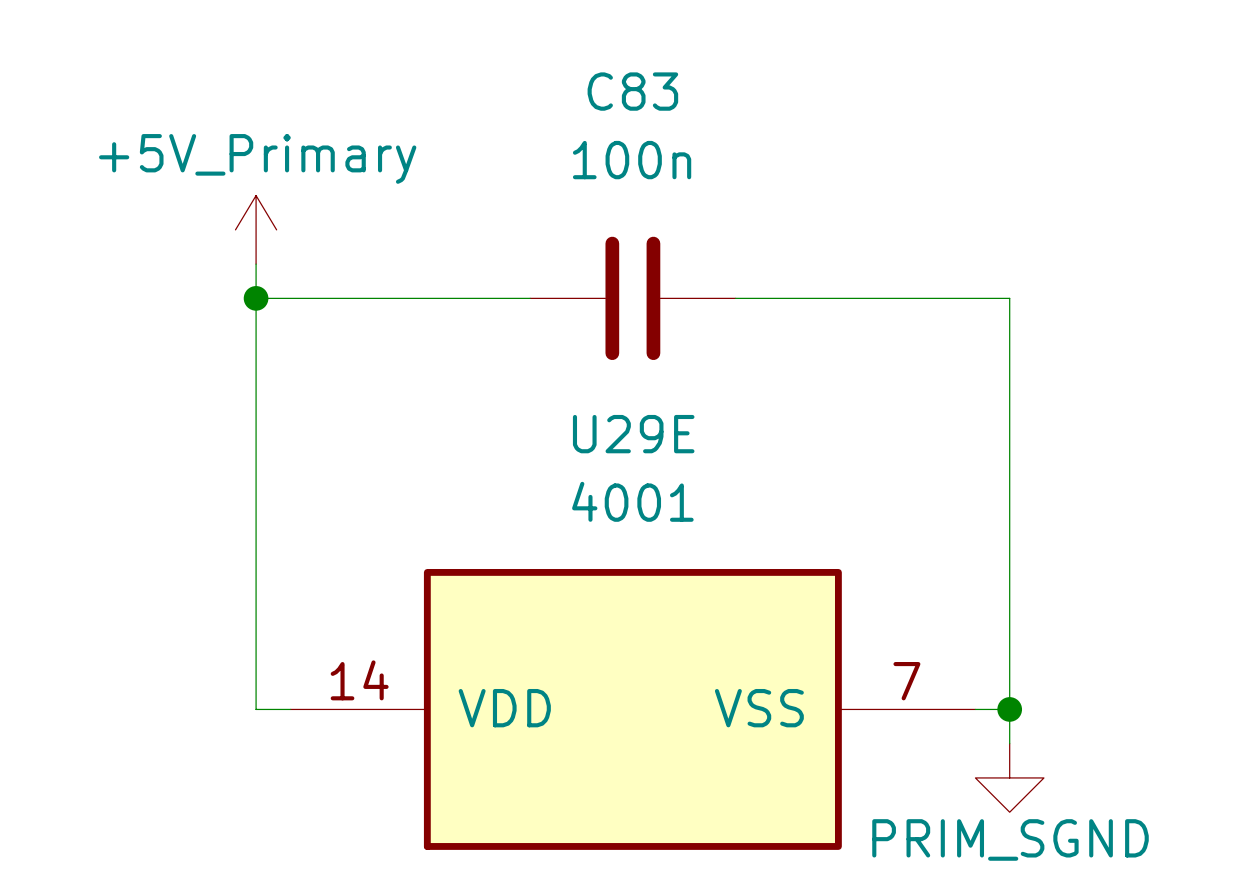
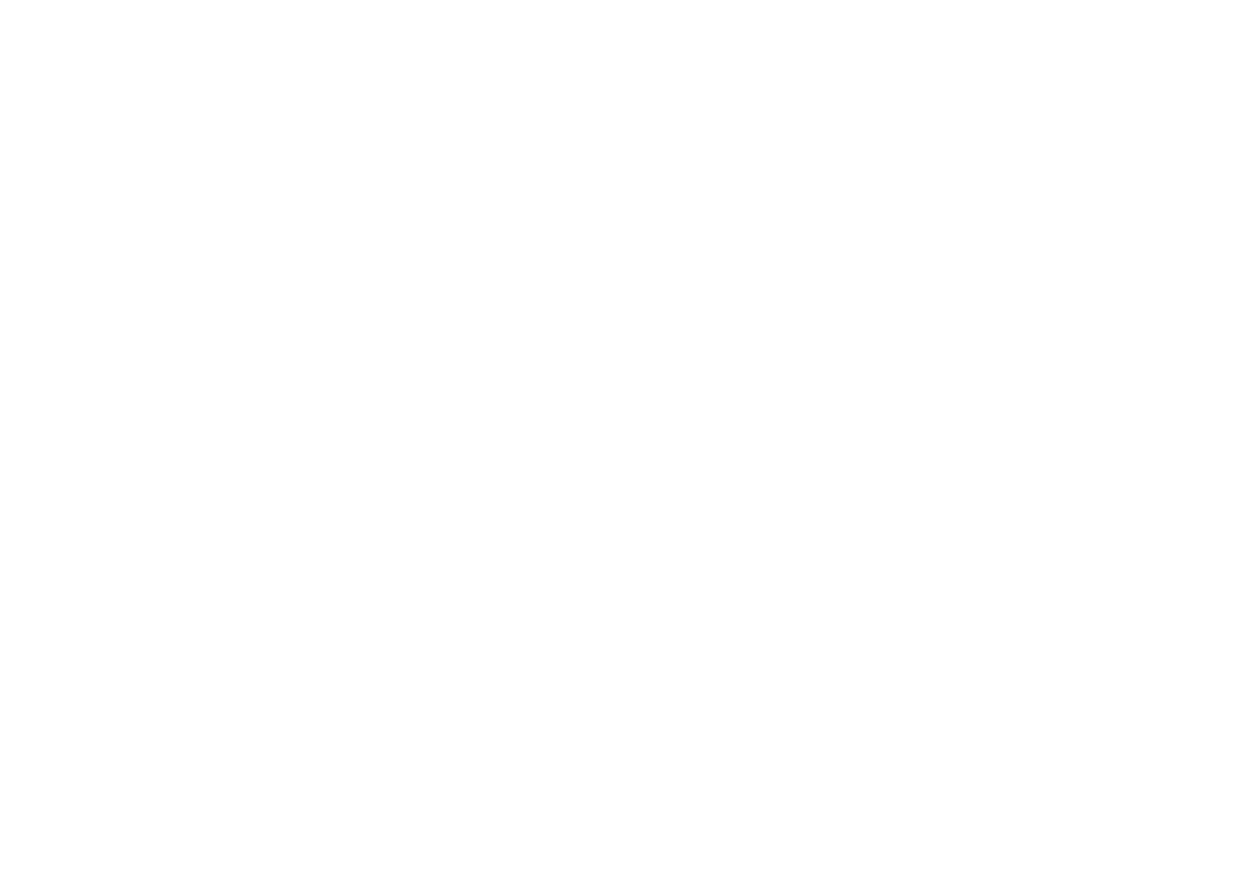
power symbol: +5V_Primary (256, 229) -> none
wire: (256, 264) (256, 709) (290, 709) -> none
wire: (256, 298) (530, 298) -> none
junction: (256, 298) -> none
C83: 100n (632, 298) -> none
wire: (735, 298) (1009, 298) (1009, 743) -> none
U29E: 4001 (632, 709) -> none
wire: (975, 709) (1009, 709) -> none
junction: (1009, 709) -> none
power symbol: PRIM_SGND (1009, 777) -> none

